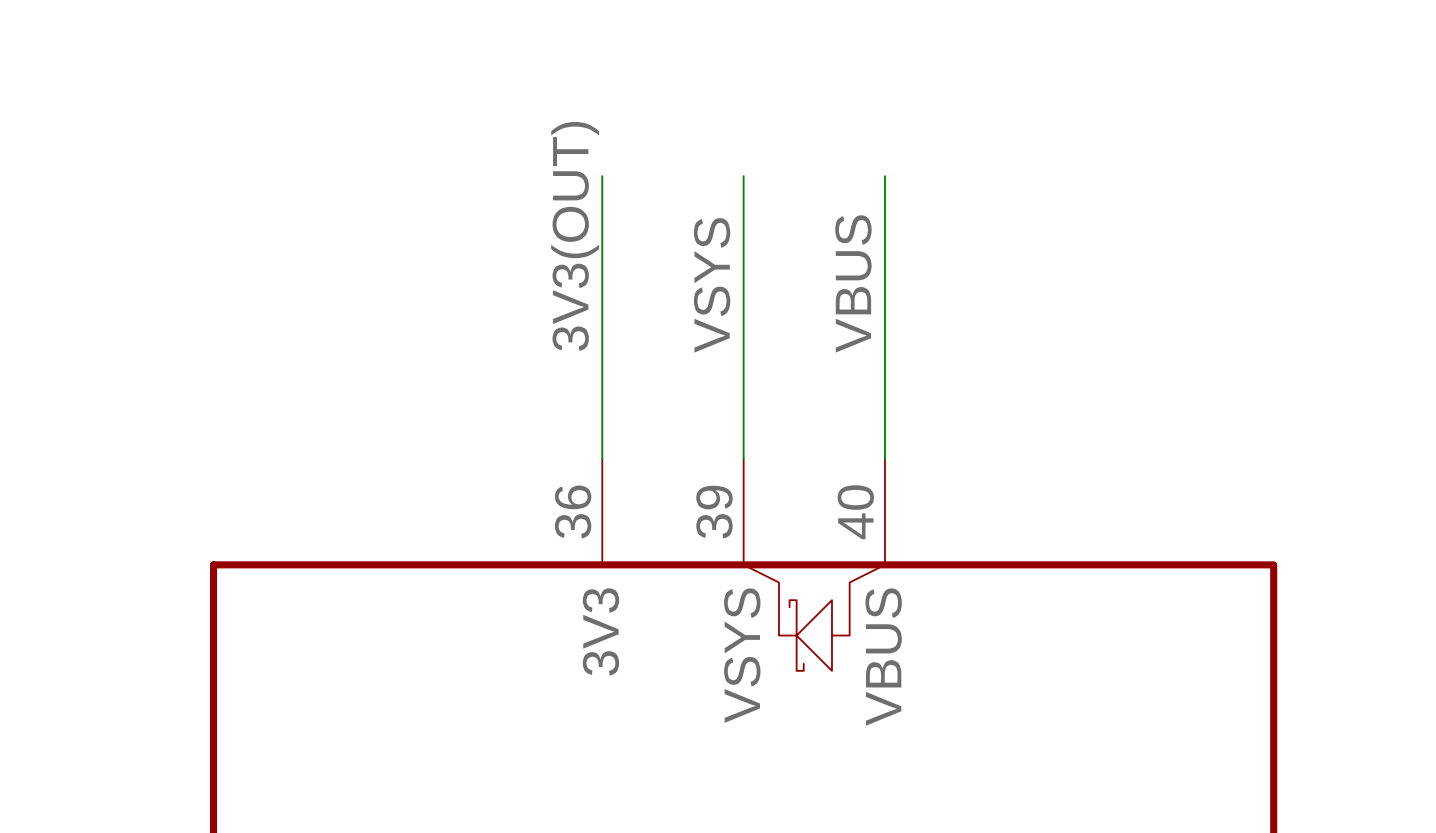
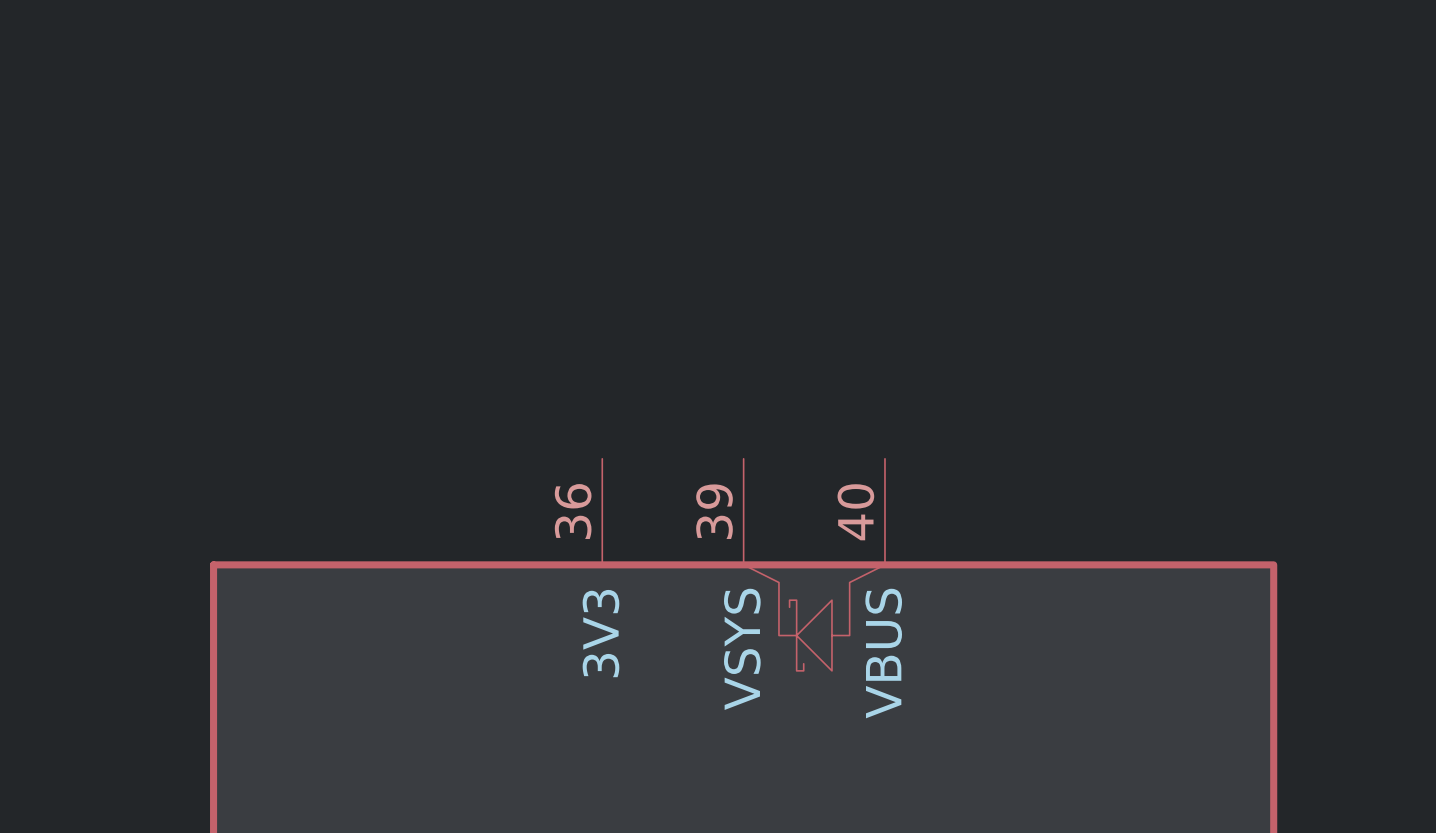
wire: (602, 176) (602, 458) -> none
wire: (743, 176) (743, 458) -> none
wire: (884, 176) (884, 458) -> none
label: 3V3(OUT) (575, 236) -> none
label: VBUS (853, 283) -> none
label: VSYS (712, 285) -> none

